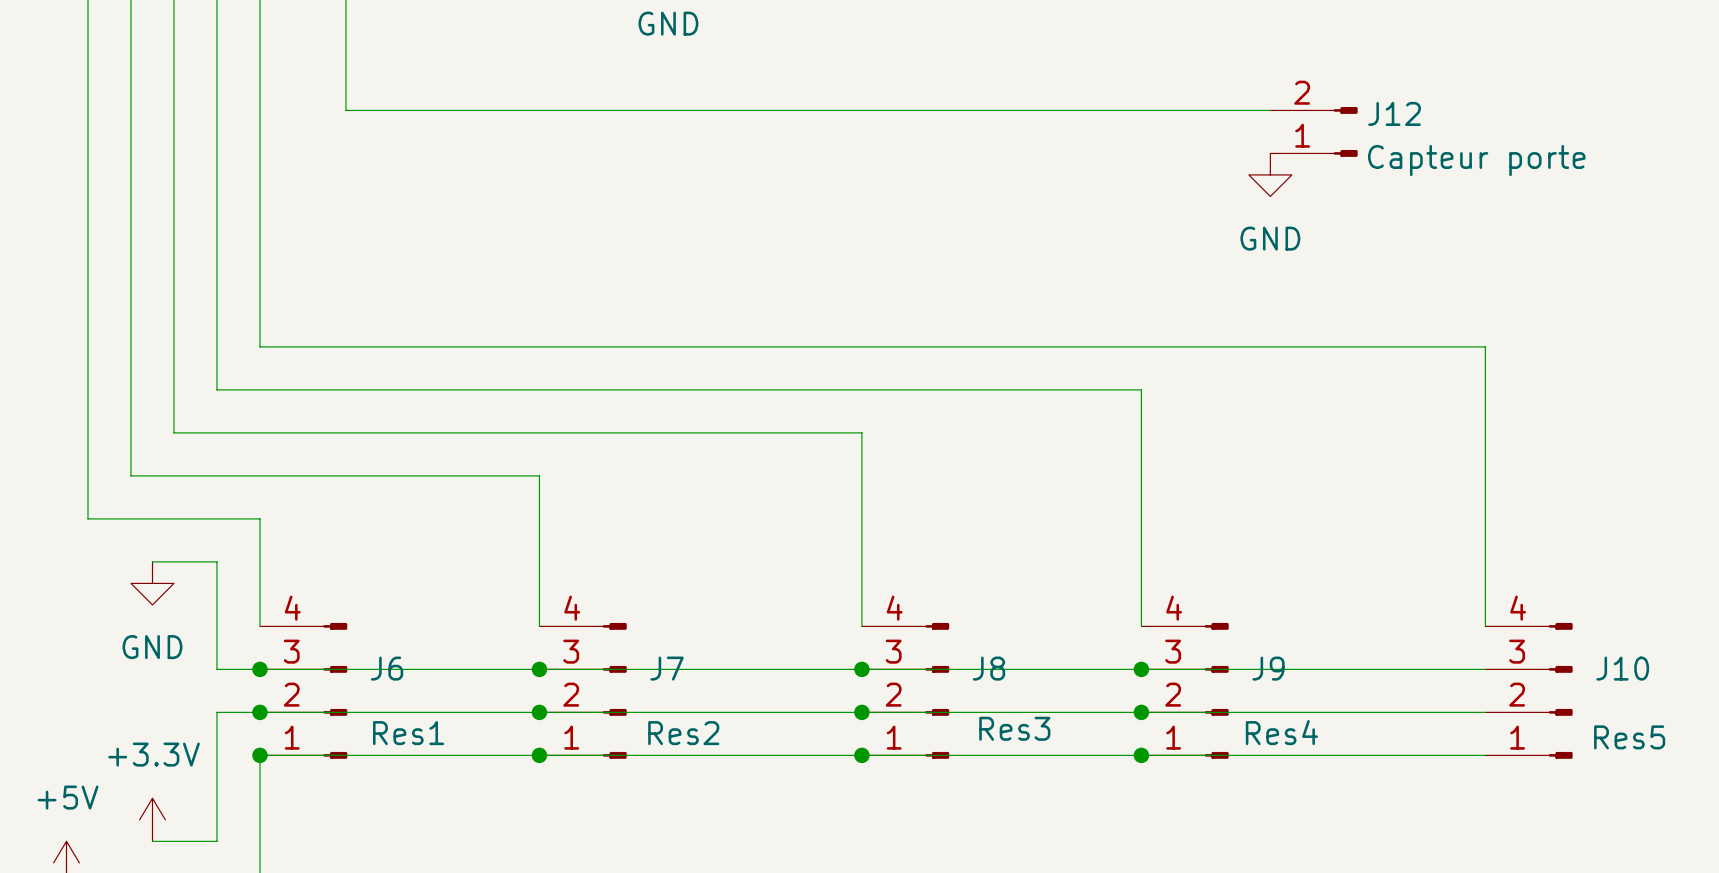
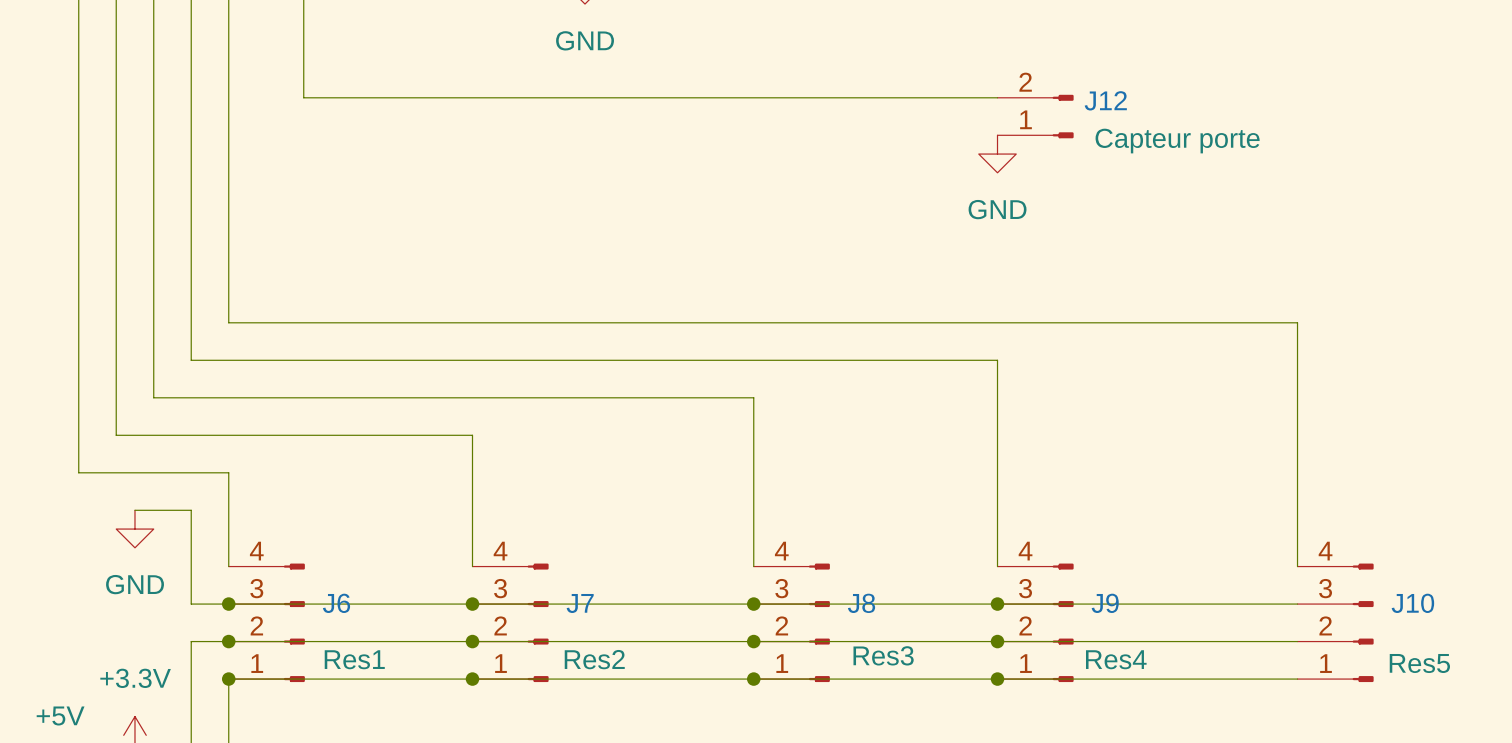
wire: (345, 88) (345, 110) (1270, 110) -> (303, 97) (997, 97)
J12 position: (1314, 131) -> (1035, 116)
power symbol position: GND (1270, 174) -> GND (997, 154)

